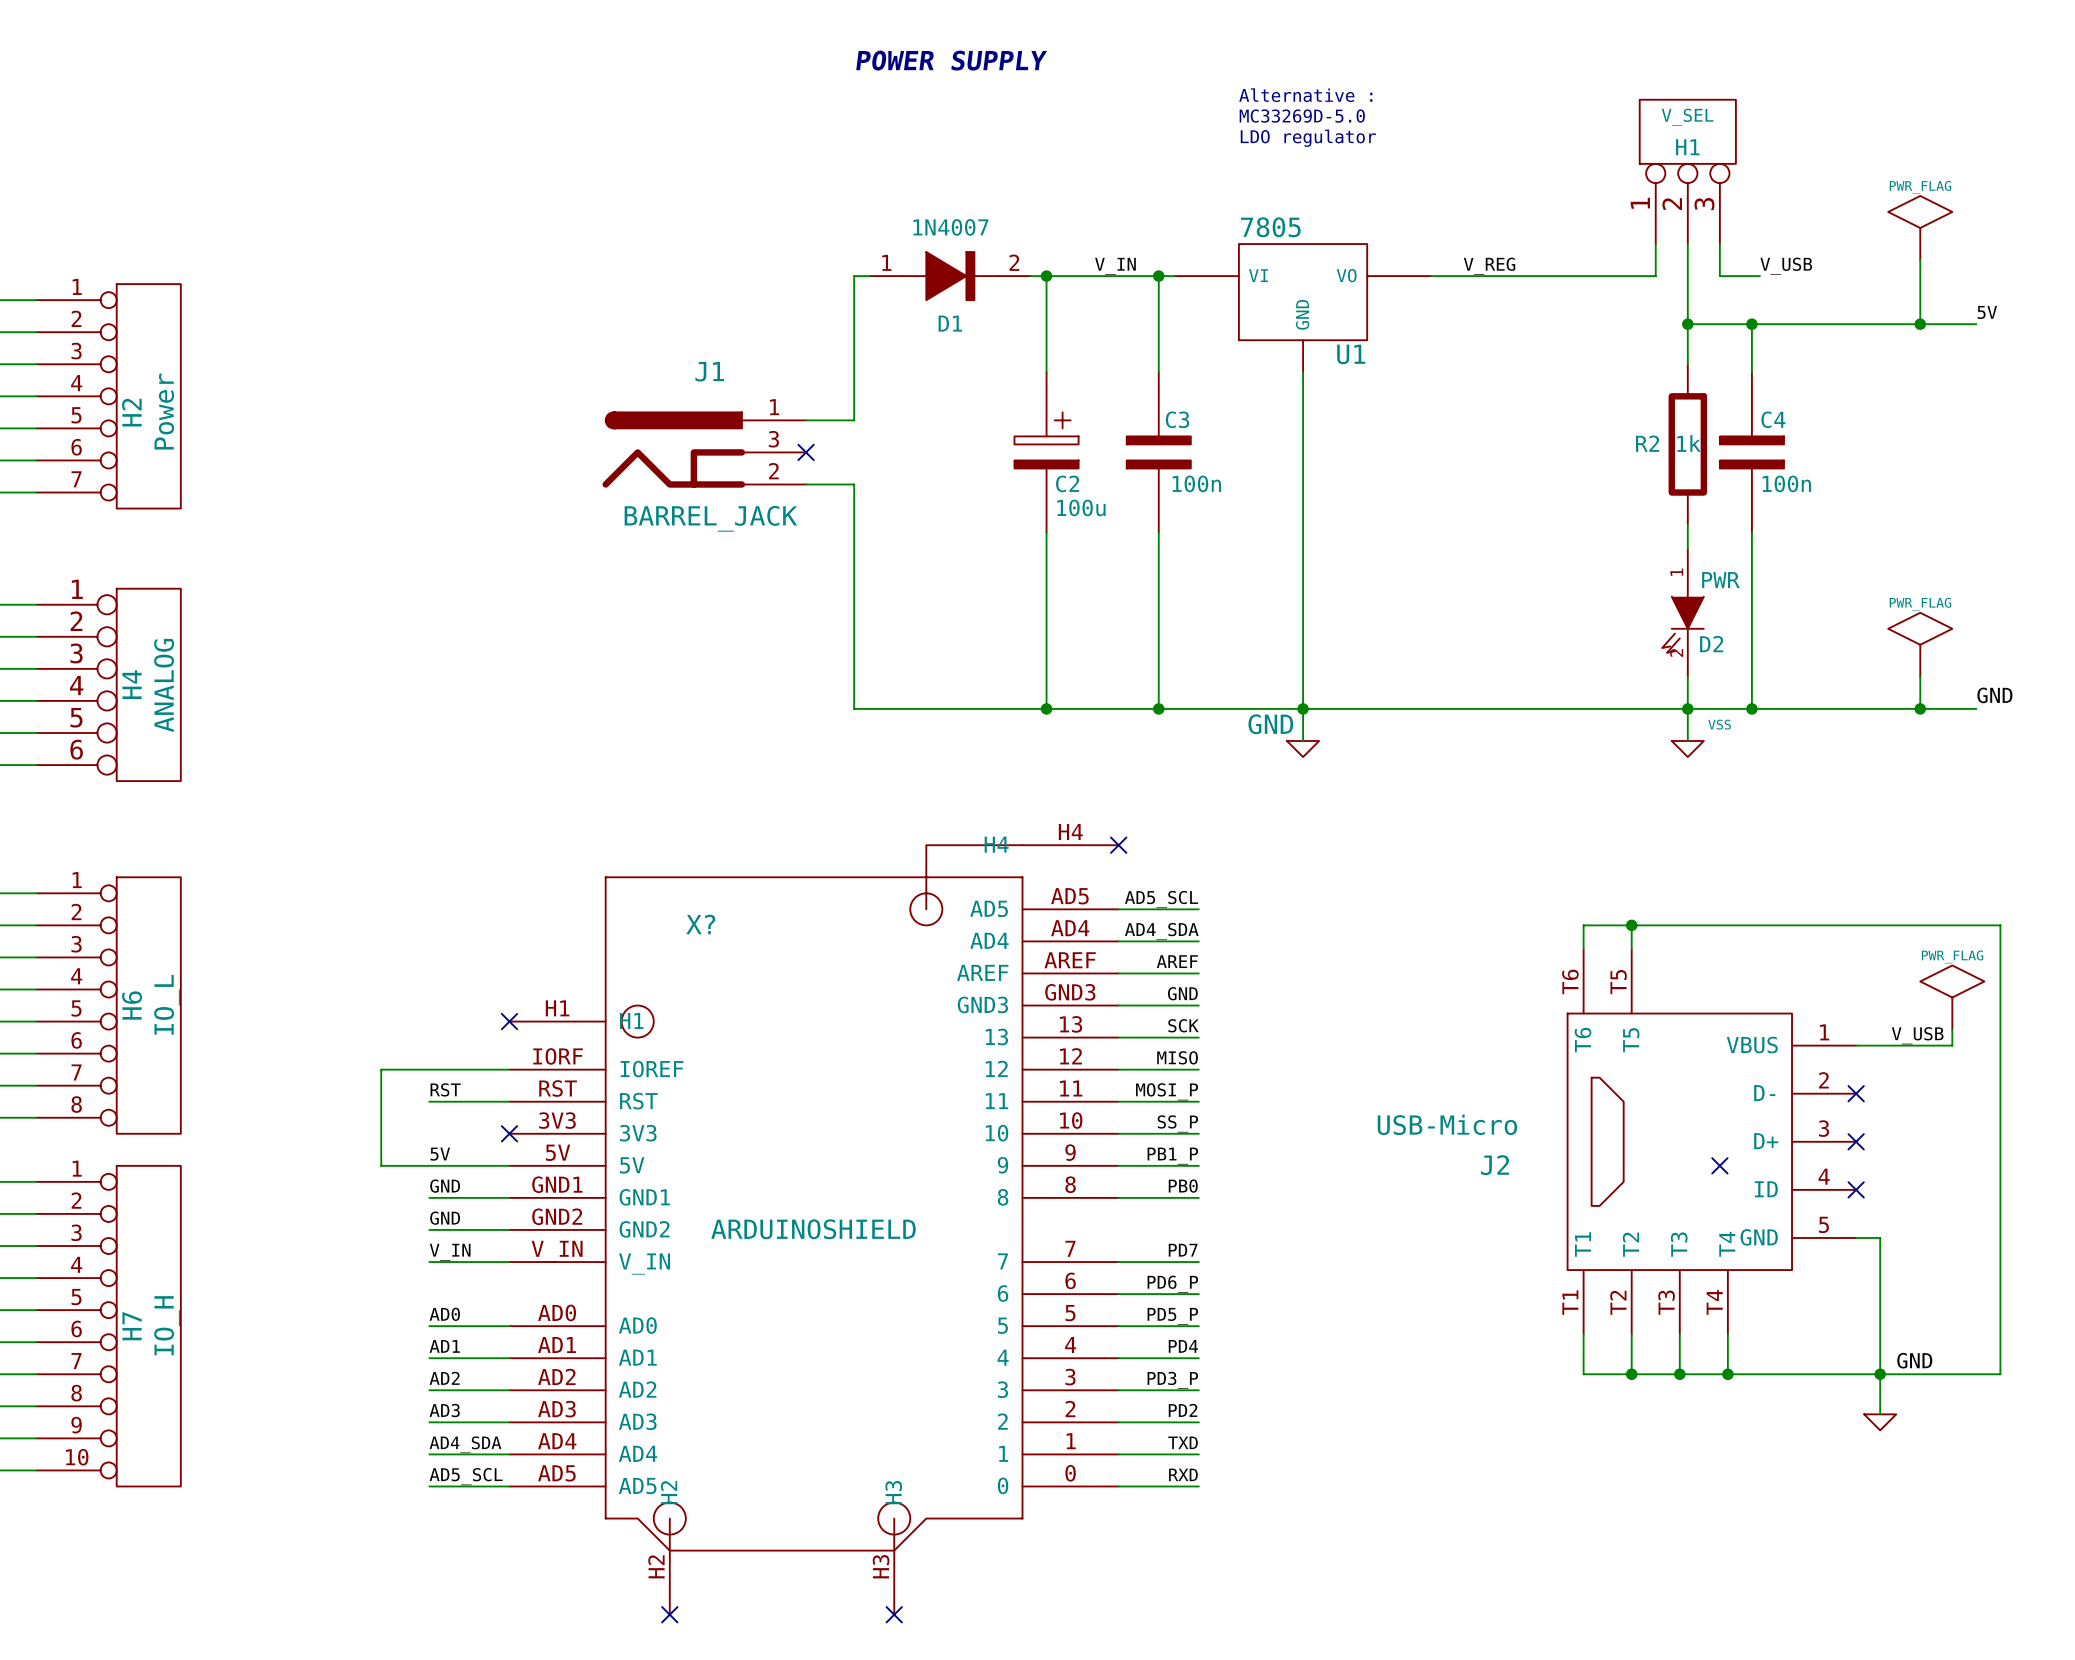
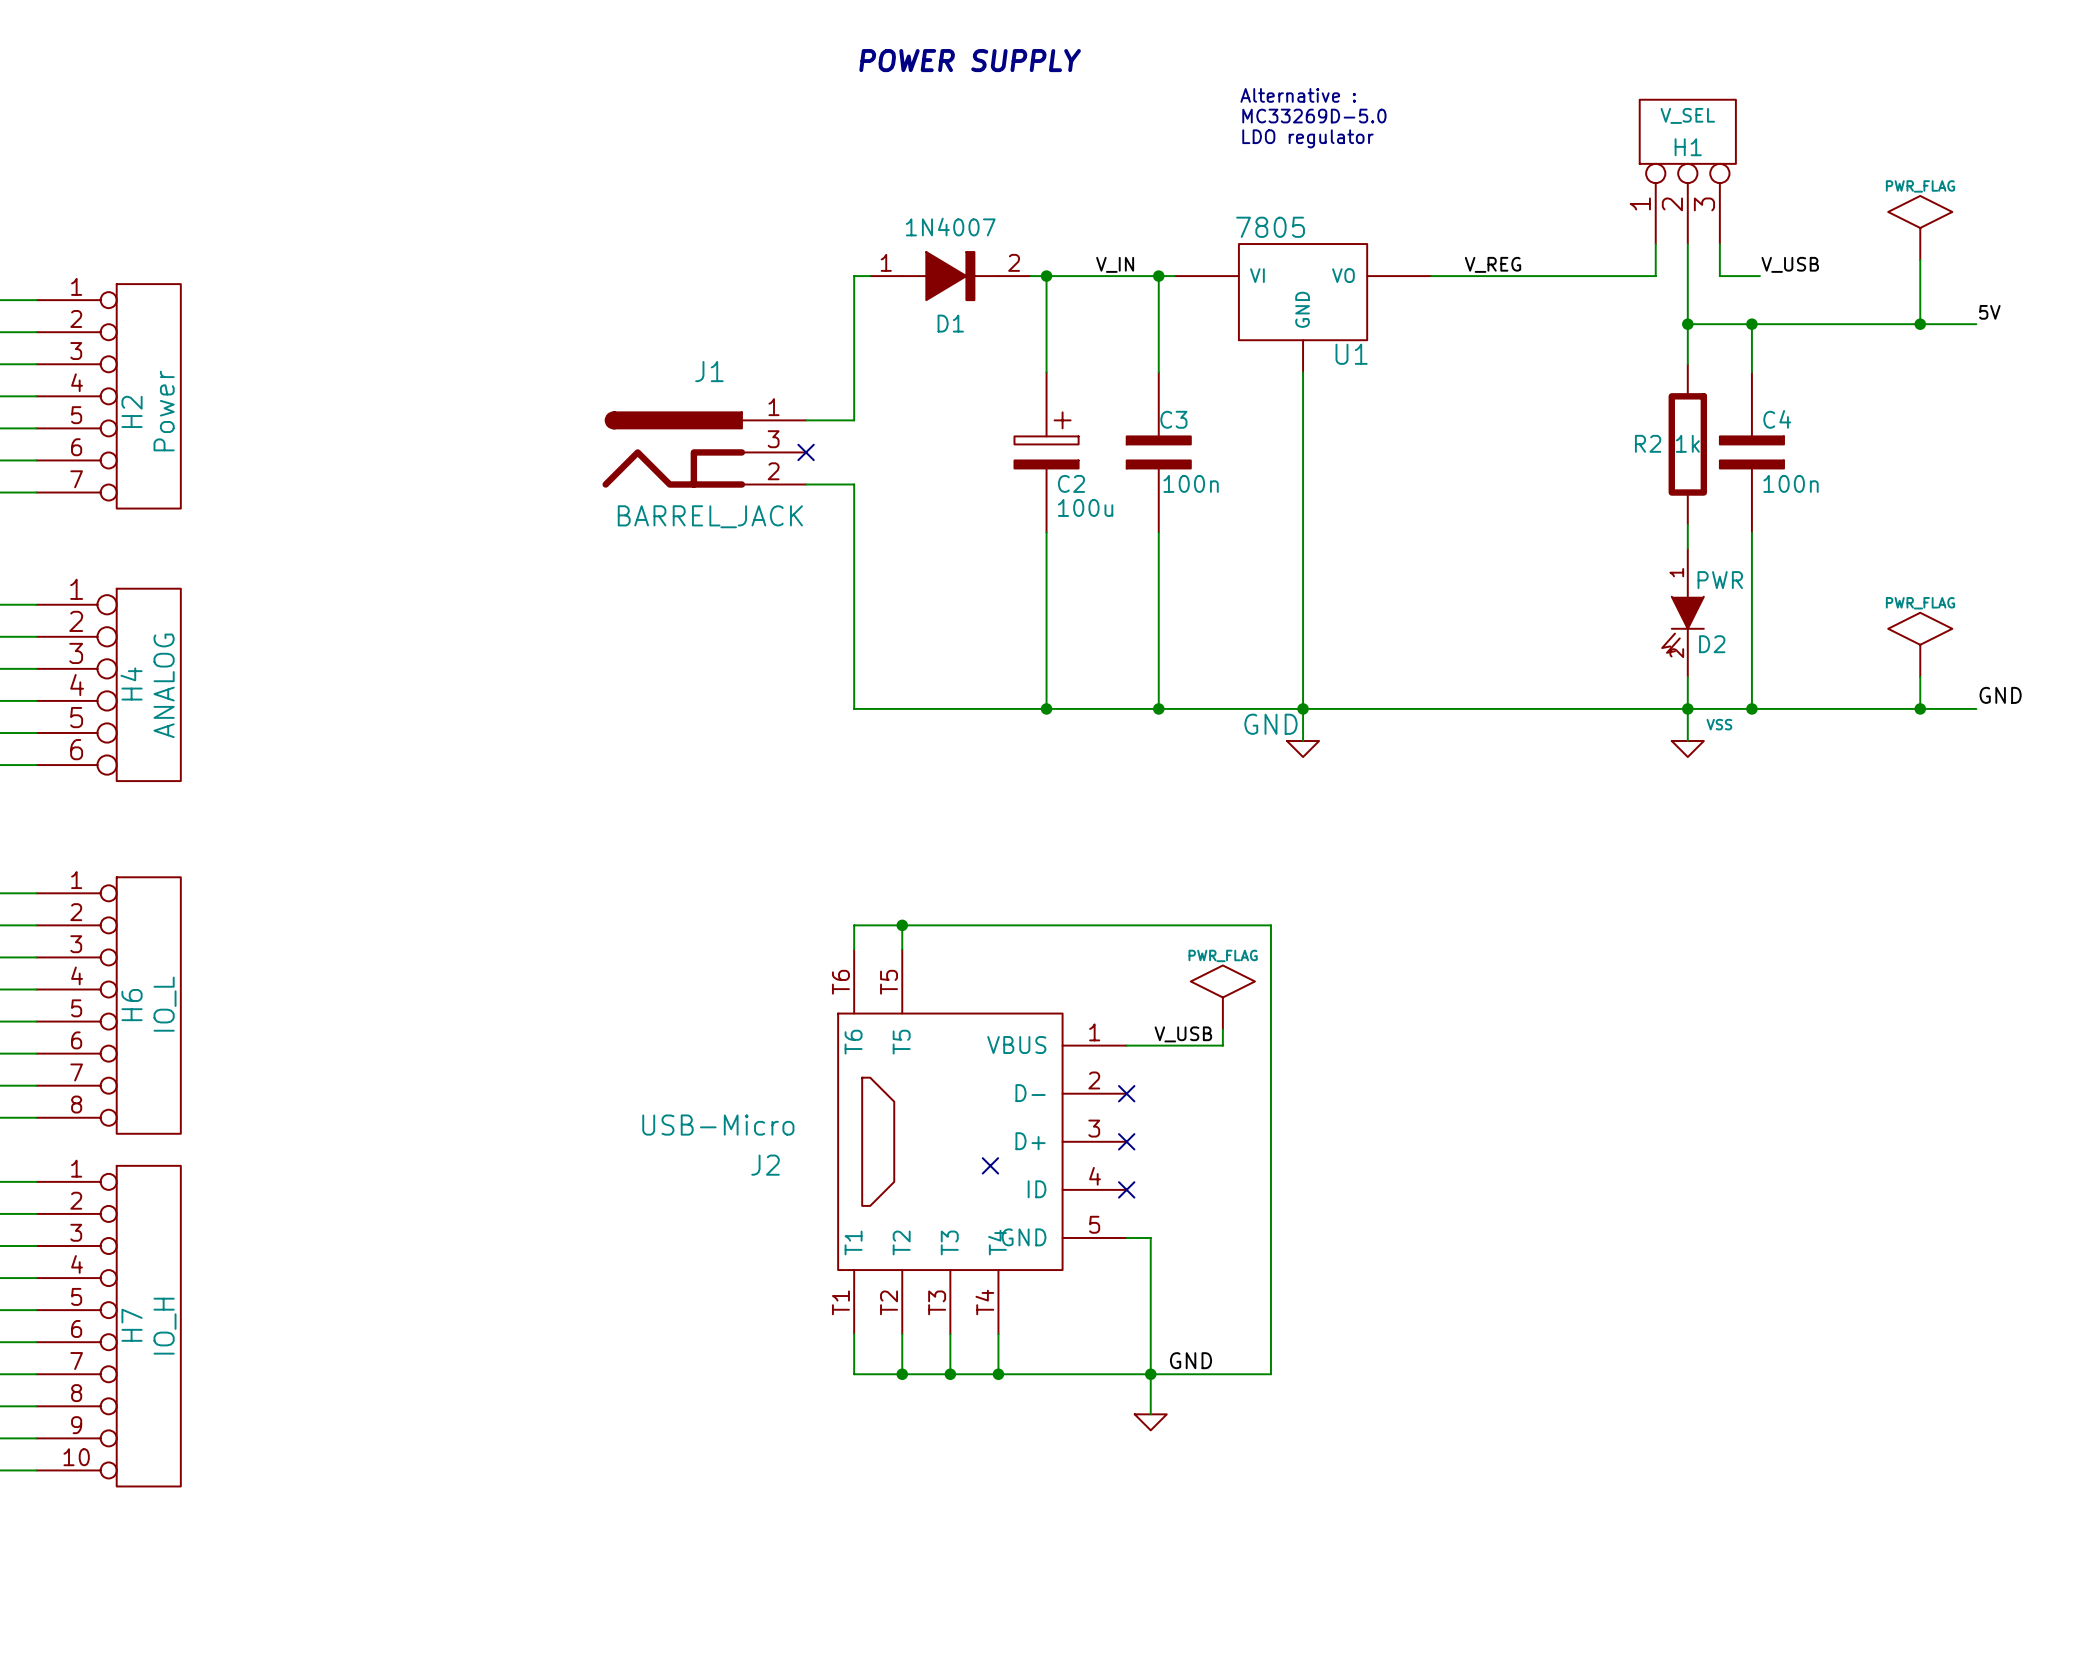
no-connect mark: (1118, 845) -> none
label: AD5_SCL (1161, 899) -> none
wire: (1118, 909) (1198, 909) -> none
wire: none -> (902, 925) (902, 949)
junction: none -> (902, 925)
wire: (1631, 925) (1631, 949) -> none
junction: (1631, 925) -> none
label: AD4_SDA (1161, 931) -> none
wire: (1118, 941) (1198, 941) -> none
wire: none -> (854, 949) (854, 925) (1270, 925) (1270, 1374) (854, 1374) (854, 1334)
wire: (1583, 949) (1583, 925) (2000, 925) (2000, 1374) (1583, 1374) (1583, 1334) -> none
label: AREF (1177, 961) -> none
wire: (1118, 973) (1198, 973) -> none
label: GND (1182, 993) -> none
power symbol: none -> PWR_FLAG (1222, 997)
power symbol: PWR_FLAG (1952, 997) -> none
wire: (1118, 1005) (1198, 1005) -> none
no-connect mark: (509, 1021) -> none
label: SCK (1183, 1025) -> none
wire: none -> (1222, 1029) (1222, 1045) (1126, 1045)
wire: (1952, 1029) (1952, 1045) (1856, 1045) -> none
label: none -> V_USB (1183, 1034)
label: V_USB (1917, 1035) -> none
wire: (1118, 1037) (1198, 1037) -> none
label: MISO (1177, 1057) -> none
wire: (509, 1069) (381, 1069) (381, 1165) (509, 1165) -> none
wire: (1118, 1069) (1198, 1069) -> none
label: RST (445, 1089) -> none
label: MOSI_P (1167, 1091) -> none
no-connect mark: none -> (1126, 1093)
no-connect mark: (1856, 1093) -> none
wire: (429, 1101) (509, 1101) -> none
wire: (1118, 1101) (1198, 1101) -> none
label: SS_P (1177, 1123) -> none
no-connect mark: (509, 1133) -> none
wire: (1118, 1133) (1198, 1133) -> none
no-connect mark: none -> (1126, 1141)
J2 position: (1711, 1141) -> (982, 1141)
no-connect mark: (1856, 1141) -> none
label: 5V (440, 1154) -> none
label: PB1_P (1172, 1156) -> none
no-connect mark: none -> (990, 1165)
wire: (1118, 1165) (1198, 1165) -> none
no-connect mark: (1719, 1165) -> none
label: GND (445, 1186) -> none
label: PB0 (1183, 1186) -> none
no-connect mark: none -> (1126, 1189)
no-connect mark: (1856, 1189) -> none
wire: (429, 1197) (509, 1197) -> none
wire: (1118, 1197) (1198, 1197) -> none
label: GND (445, 1218) -> none
wire: (429, 1229) (509, 1229) -> none
X?: ARDUINOSHIELD (814, 1229) -> none
wire: none -> (1126, 1237) (1150, 1237) (1150, 1414)
wire: (1856, 1237) (1880, 1237) (1880, 1414) -> none
label: PD7 (1183, 1250) -> none
label: V_IN (450, 1252) -> none
wire: (429, 1262) (509, 1262) -> none
wire: (1118, 1262) (1198, 1262) -> none
label: PD6_P (1172, 1284) -> none
wire: (1118, 1294) (1198, 1294) -> none
label: AD0 (444, 1314) -> none
label: PD5_P (1172, 1316) -> none
wire: (429, 1326) (509, 1326) -> none
wire: (1118, 1326) (1198, 1326) -> none
wire: none -> (902, 1334) (902, 1374)
wire: none -> (950, 1334) (950, 1374)
wire: none -> (998, 1334) (998, 1374)
wire: (1631, 1334) (1631, 1374) -> none
wire: (1679, 1334) (1679, 1374) -> none
wire: (1727, 1334) (1727, 1374) -> none
label: AD1 (444, 1346) -> none
label: PD4 (1183, 1346) -> none
wire: (429, 1358) (509, 1358) -> none
wire: (1118, 1358) (1198, 1358) -> none
label: none -> GND (1191, 1360)
label: GND (1914, 1360) -> none
junction: none -> (902, 1374)
junction: none -> (950, 1374)
junction: none -> (998, 1374)
junction: none -> (1150, 1374)
junction: (1631, 1374) -> none
junction: (1679, 1374) -> none
junction: (1727, 1374) -> none
junction: (1880, 1374) -> none
label: AD2 (444, 1378) -> none
label: PD3_P (1172, 1380) -> none
wire: (429, 1390) (509, 1390) -> none
wire: (1118, 1390) (1198, 1390) -> none
label: AD3 (444, 1410) -> none
label: PD2 (1183, 1410) -> none
wire: (429, 1422) (509, 1422) -> none
wire: (1118, 1422) (1198, 1422) -> none
power symbol: none -> (1150, 1422)
power symbol: (1880, 1422) -> none
label: TXD (1183, 1442) -> none
label: AD4_SDA (465, 1444) -> none
wire: (429, 1454) (509, 1454) -> none
wire: (1118, 1454) (1198, 1454) -> none
label: RXD (1183, 1474) -> none
label: AD5_SCL (466, 1476) -> none
wire: (429, 1486) (509, 1486) -> none
wire: (1118, 1486) (1198, 1486) -> none
no-connect mark: (669, 1614) -> none
no-connect mark: (894, 1614) -> none

